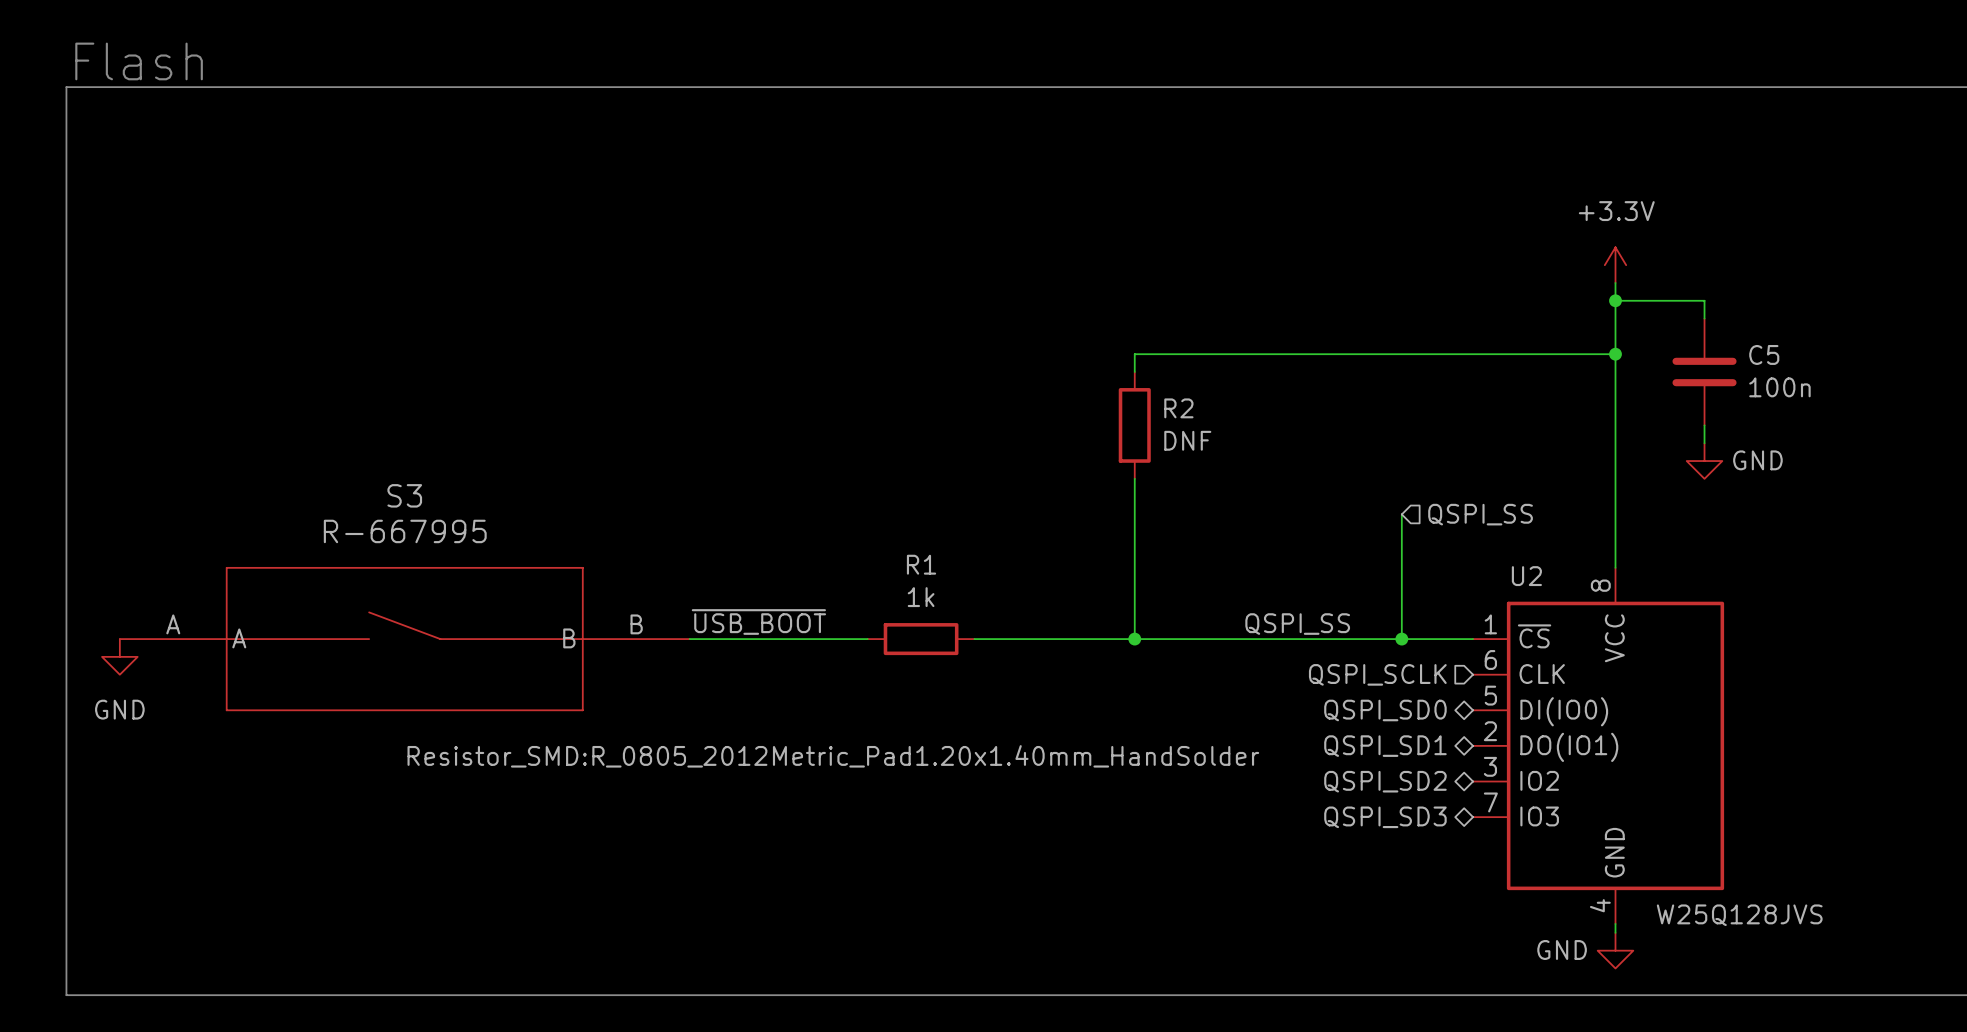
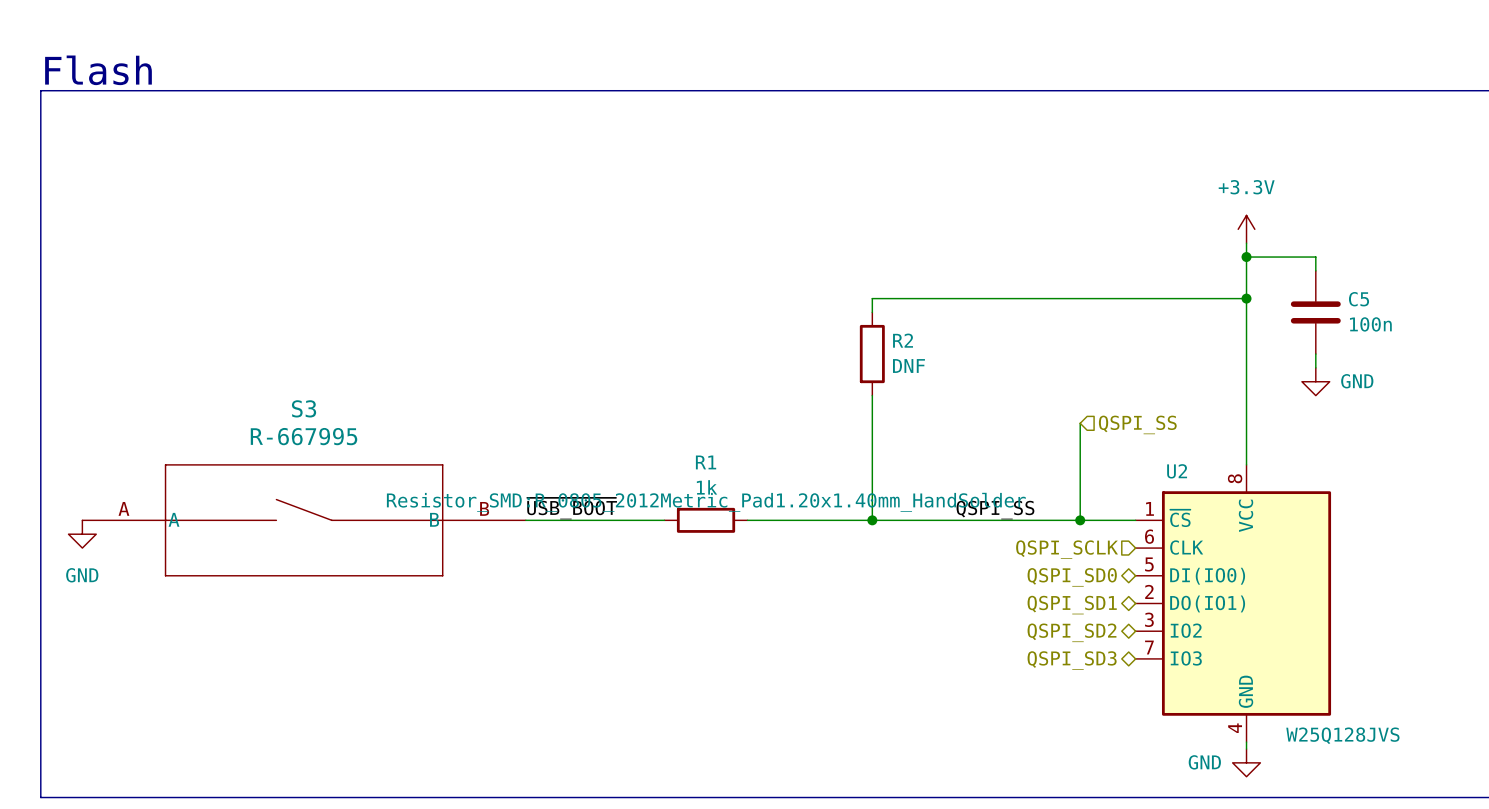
R1 text position: Resistor_SMD:R_0805_2012Metric_Pad1.20x1.40mm_HandSolder (833, 756) -> Resistor_SMD:R_0805_2012Metric_Pad1.20x1.40mm_HandSolder (706, 502)

